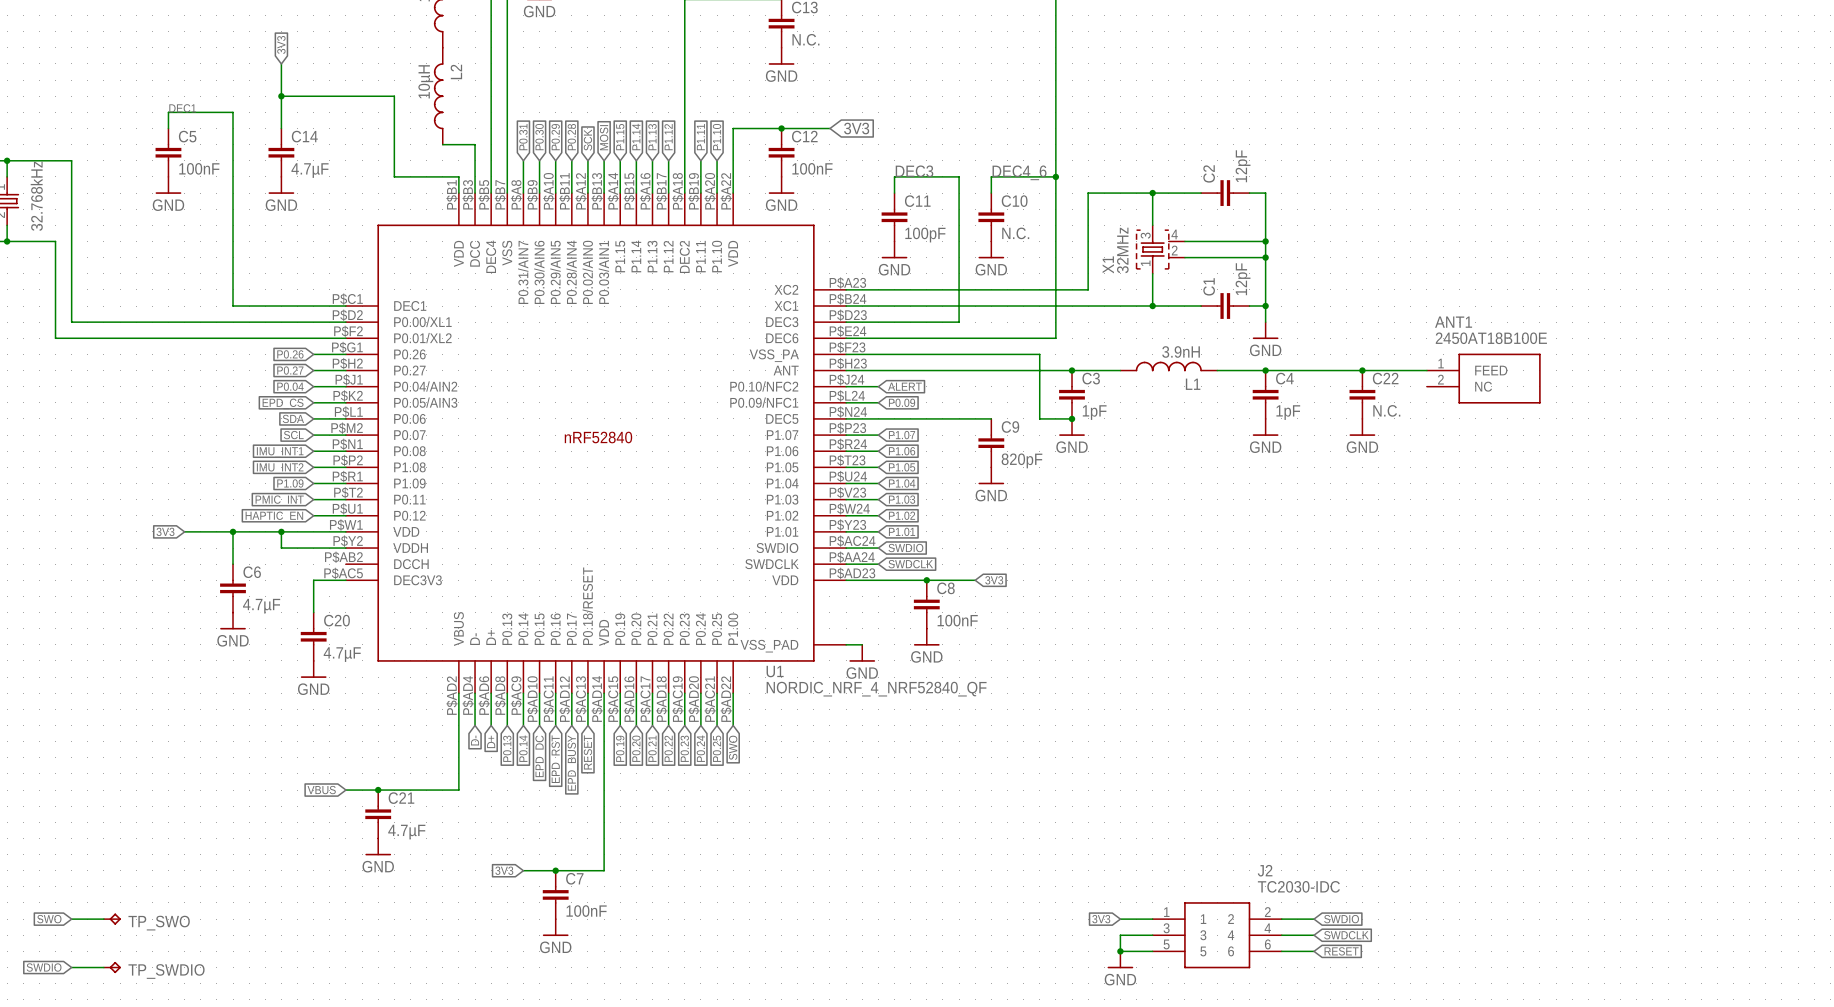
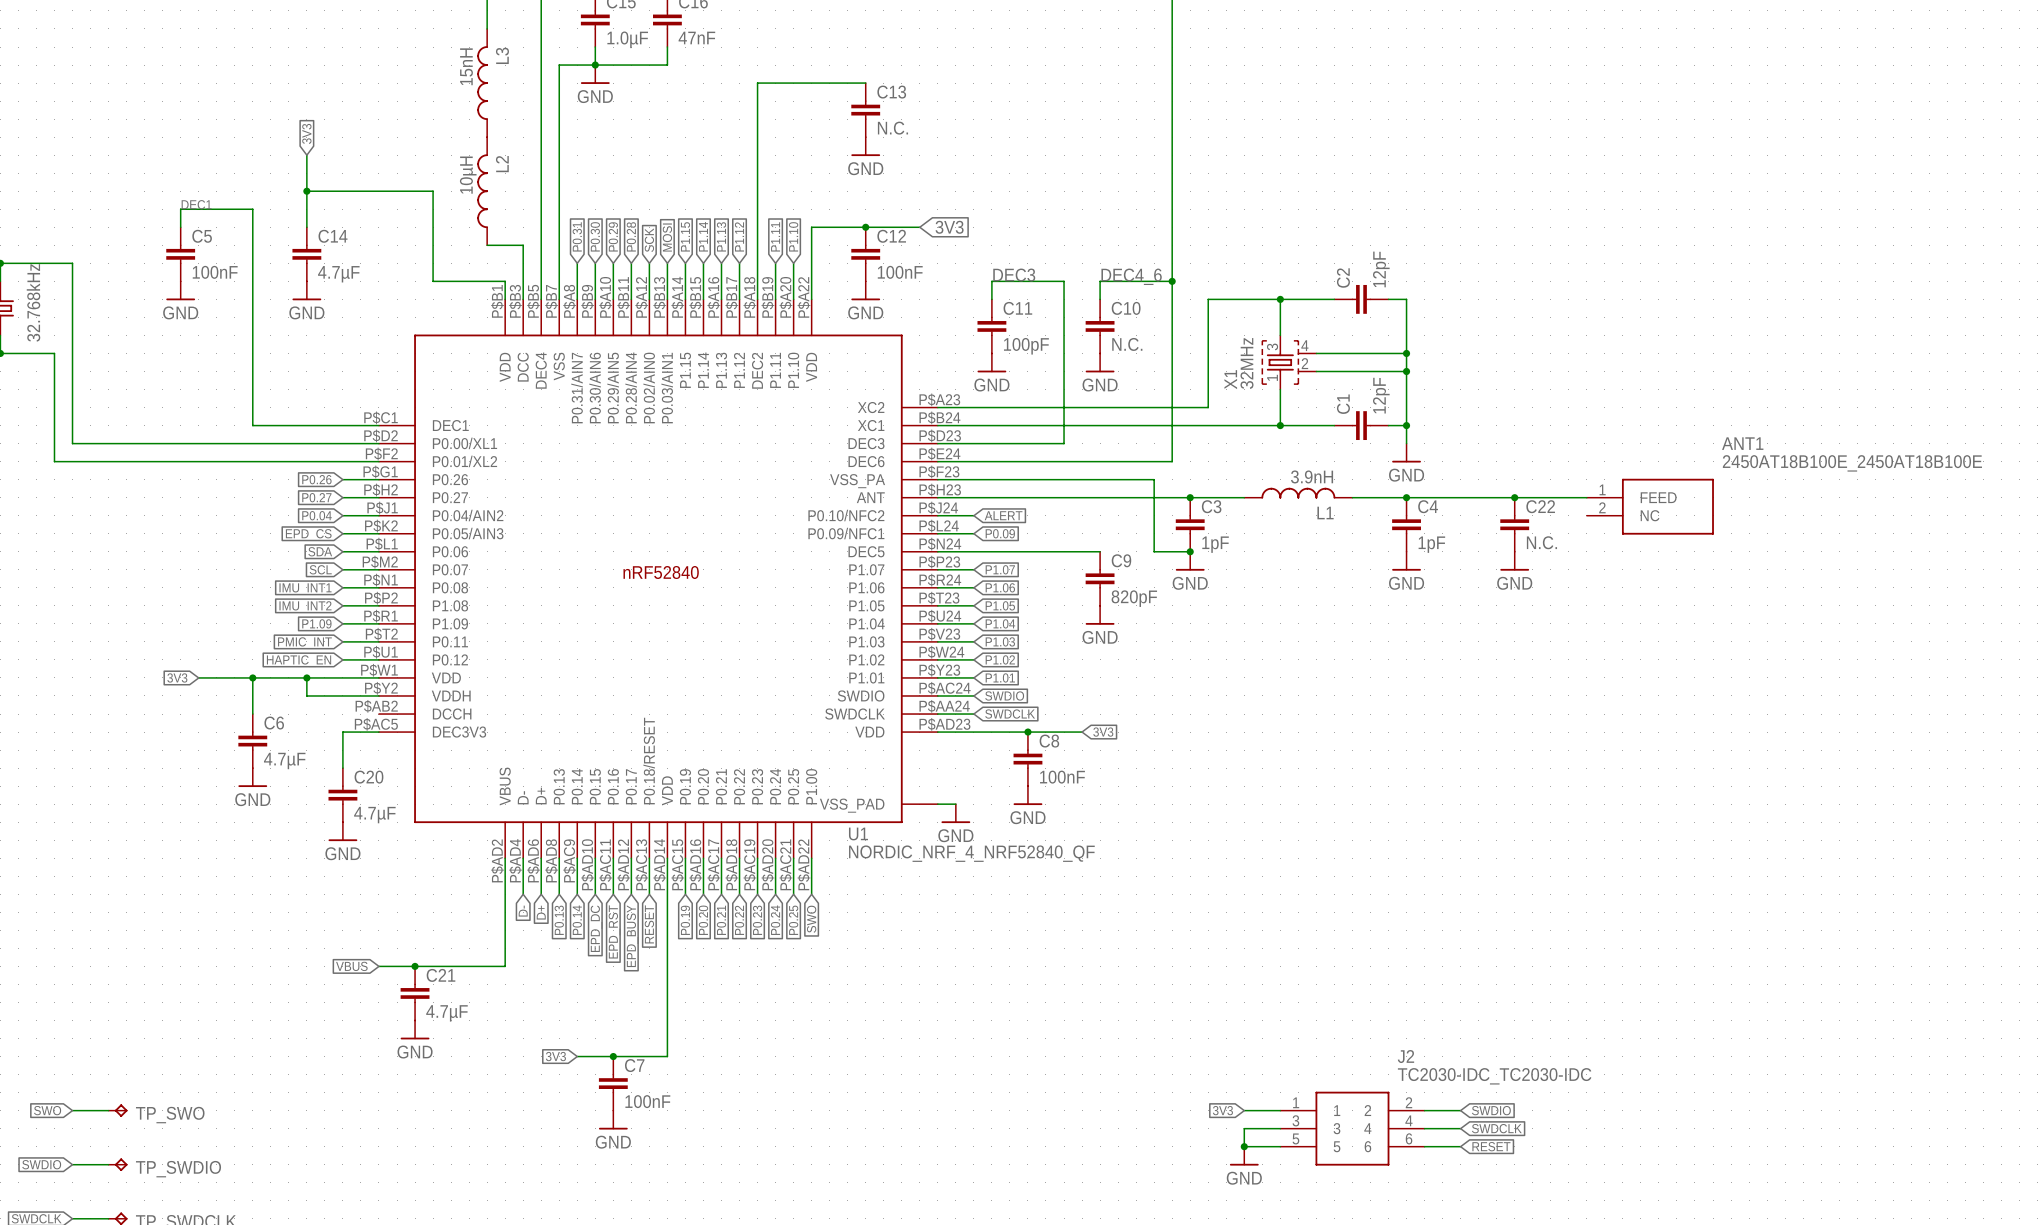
ANT1 name position: ANT1 (1453, 322) -> ANT1 (1742, 443)
ANT1 value: 2450AT18B100E (1491, 338) -> 2450AT18B100E_2450AT18B100E (1852, 463)
J2 value: TC2030-IDC (1298, 886) -> TC2030-IDC_TC2030-IDC (1494, 1076)

